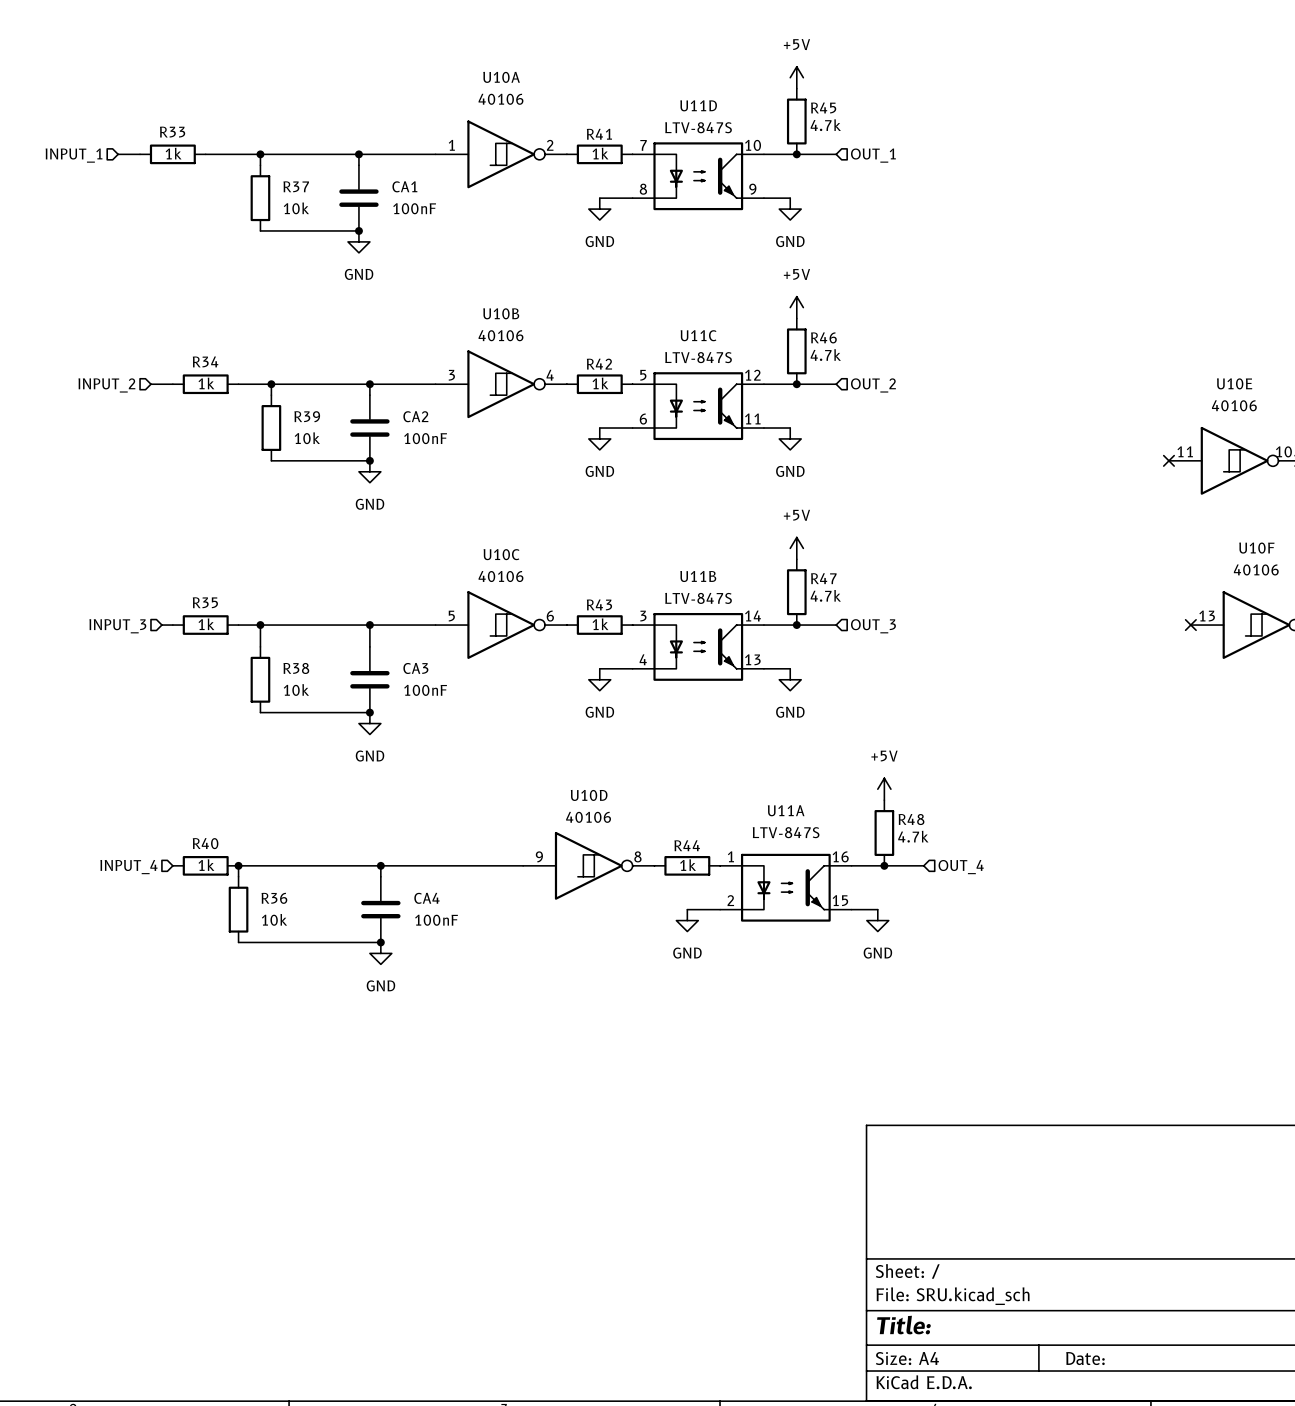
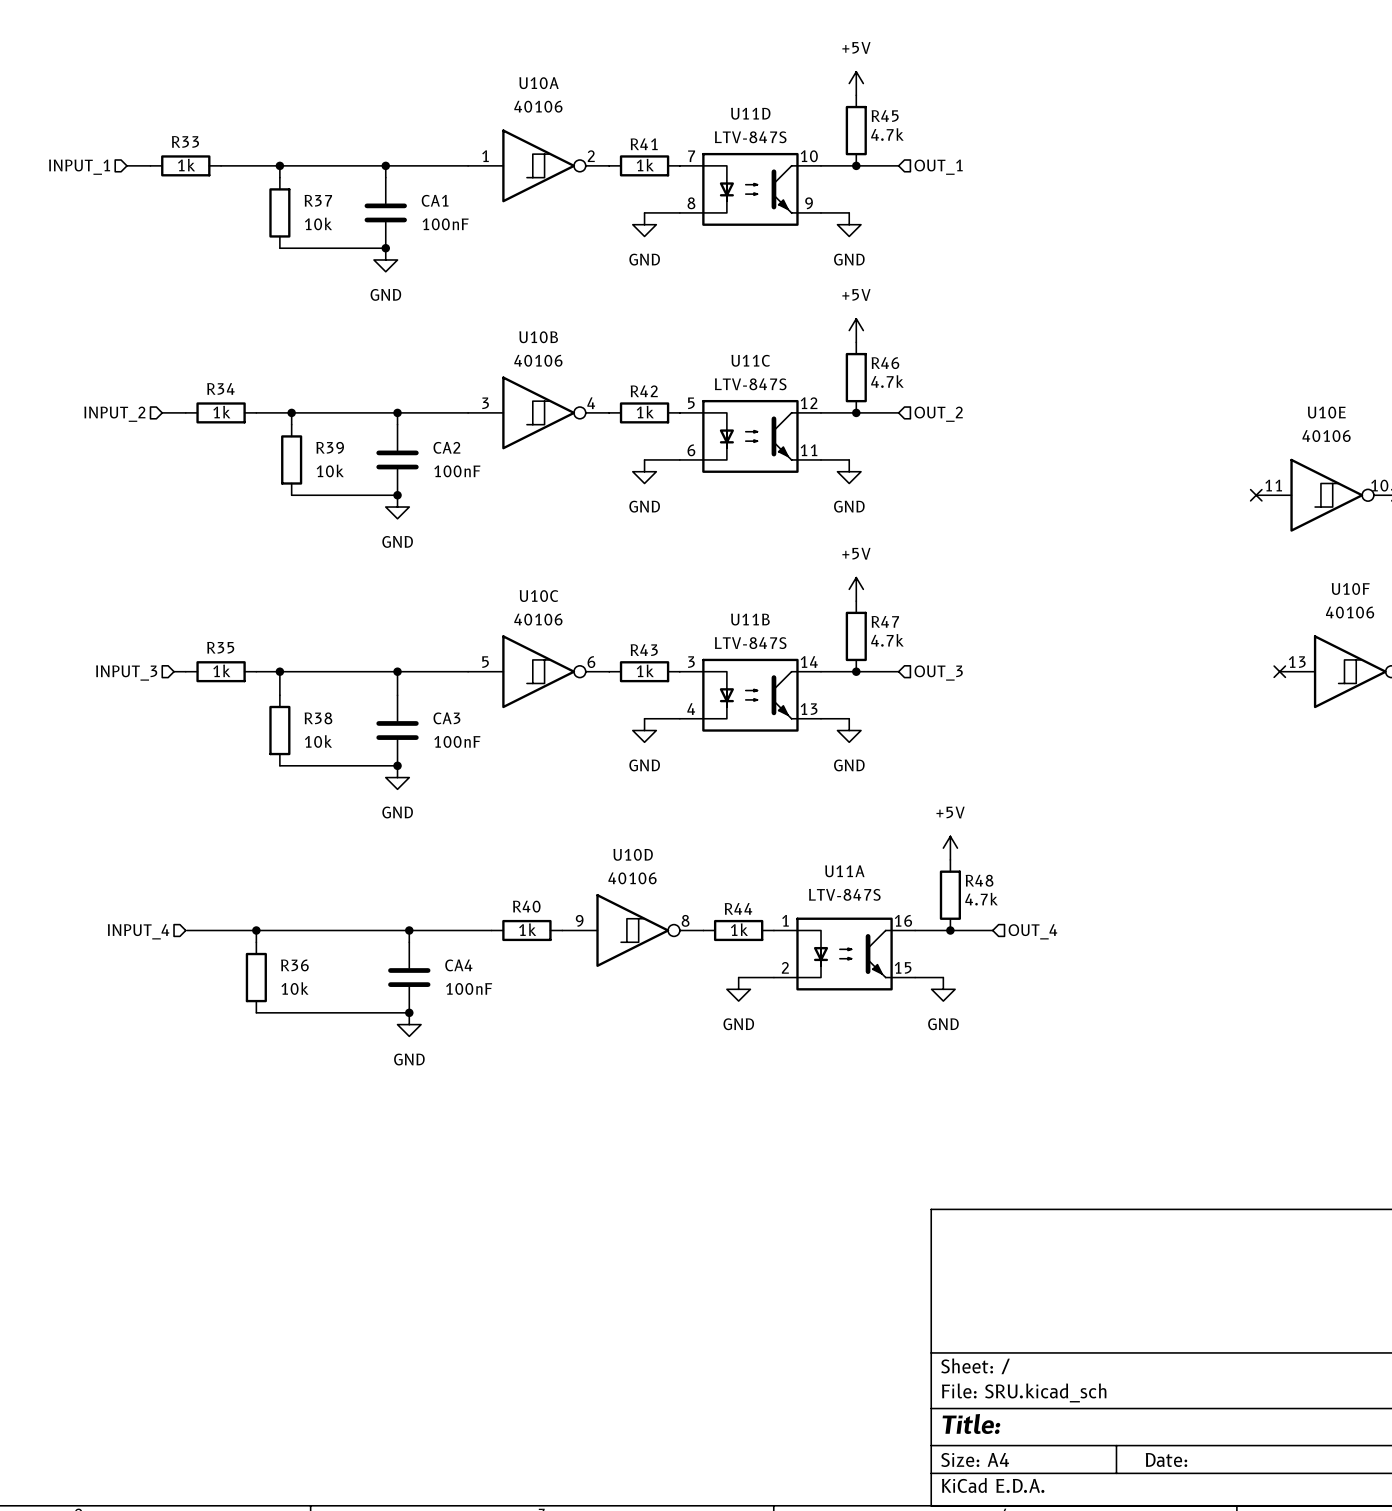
wire: none -> (186, 930) (256, 930)
R40 position: (205, 865) -> (526, 930)
wire: (457, 865) (523, 865) -> none

